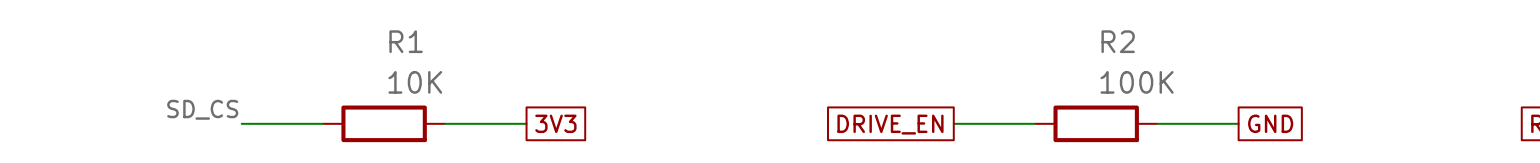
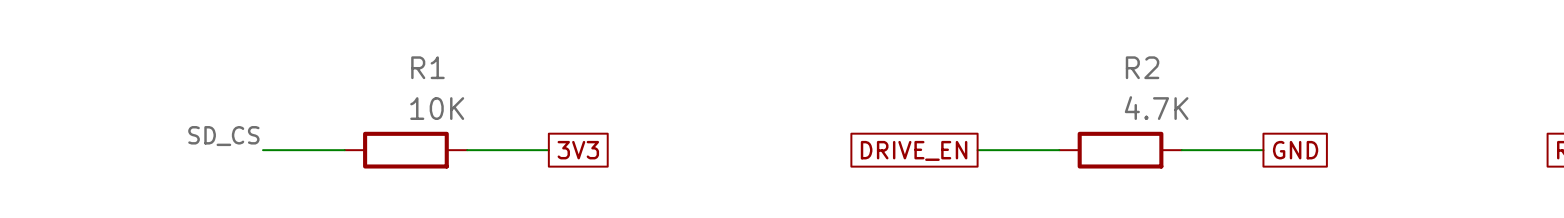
R2 value: 100K (1137, 82) -> 4.7K (1156, 108)

